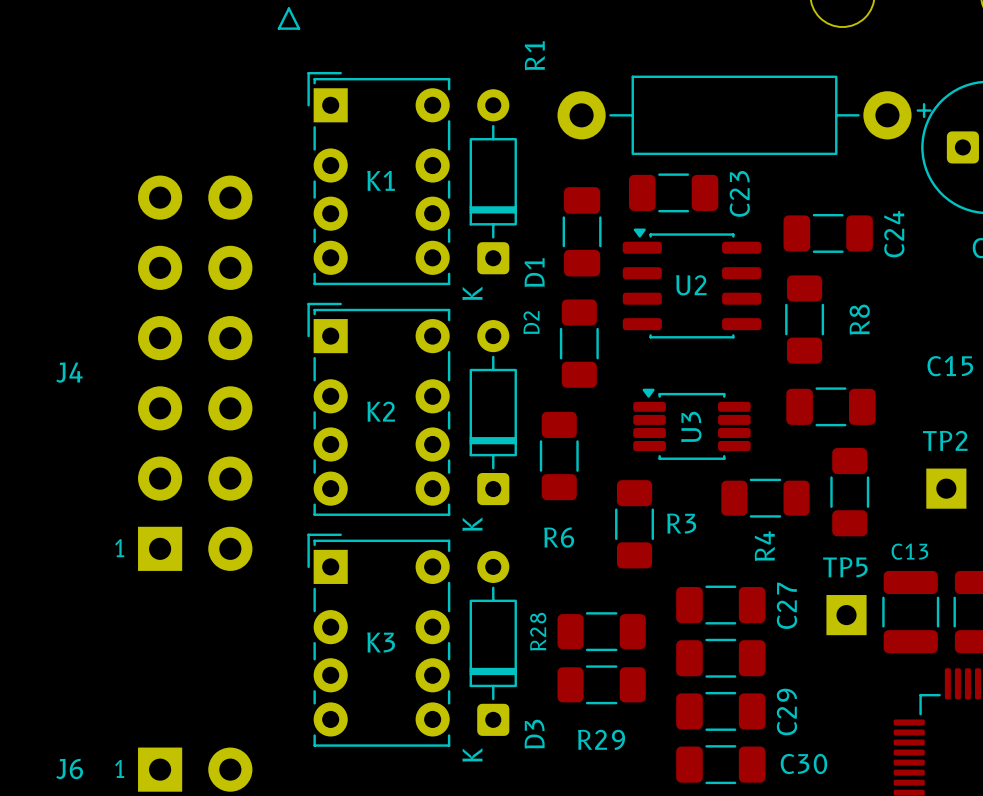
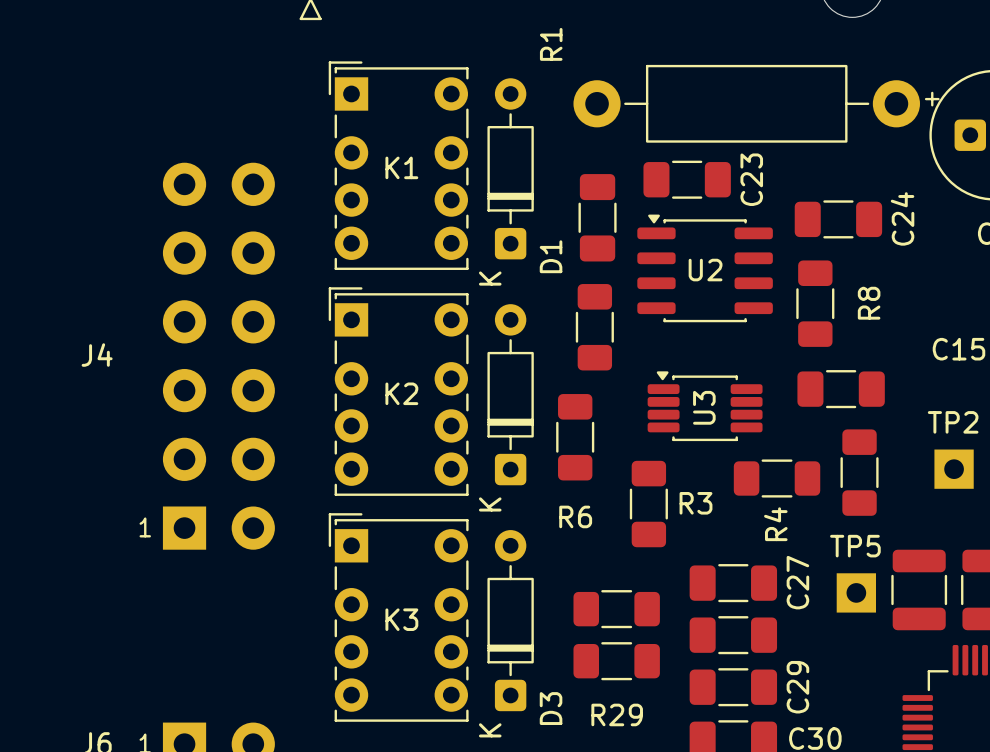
D2 name: D2 (531, 322) -> none
C13 name: C13 (909, 551) -> none
R28 name: R28 (538, 631) -> none

